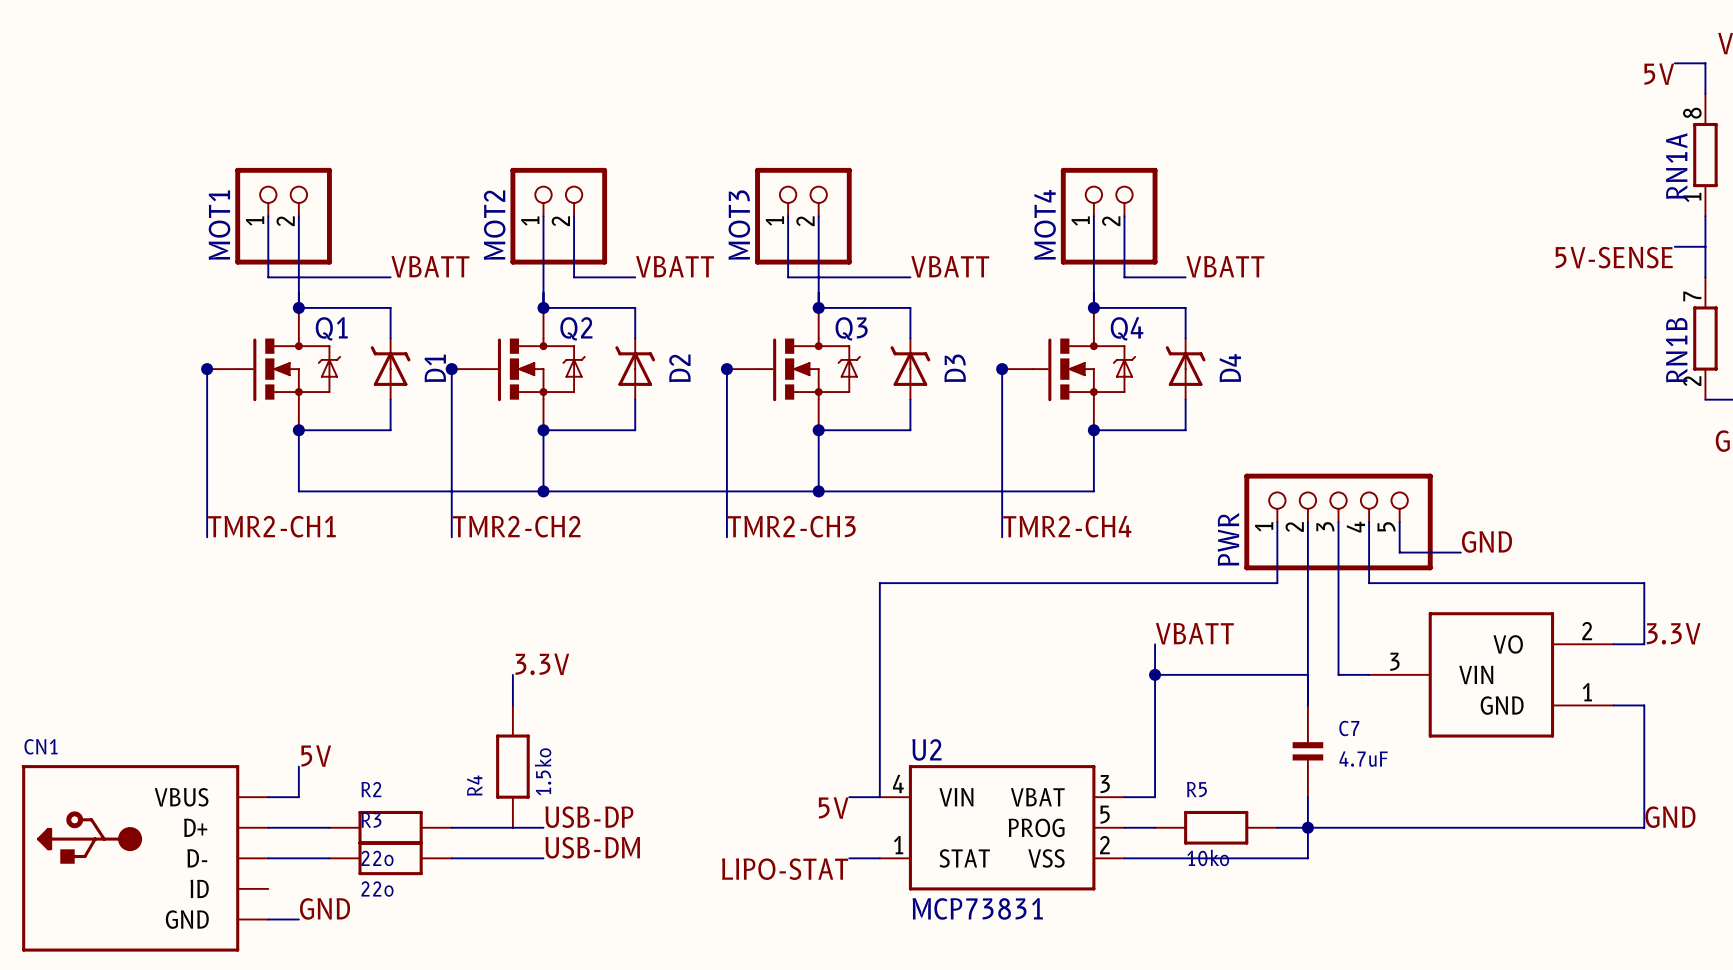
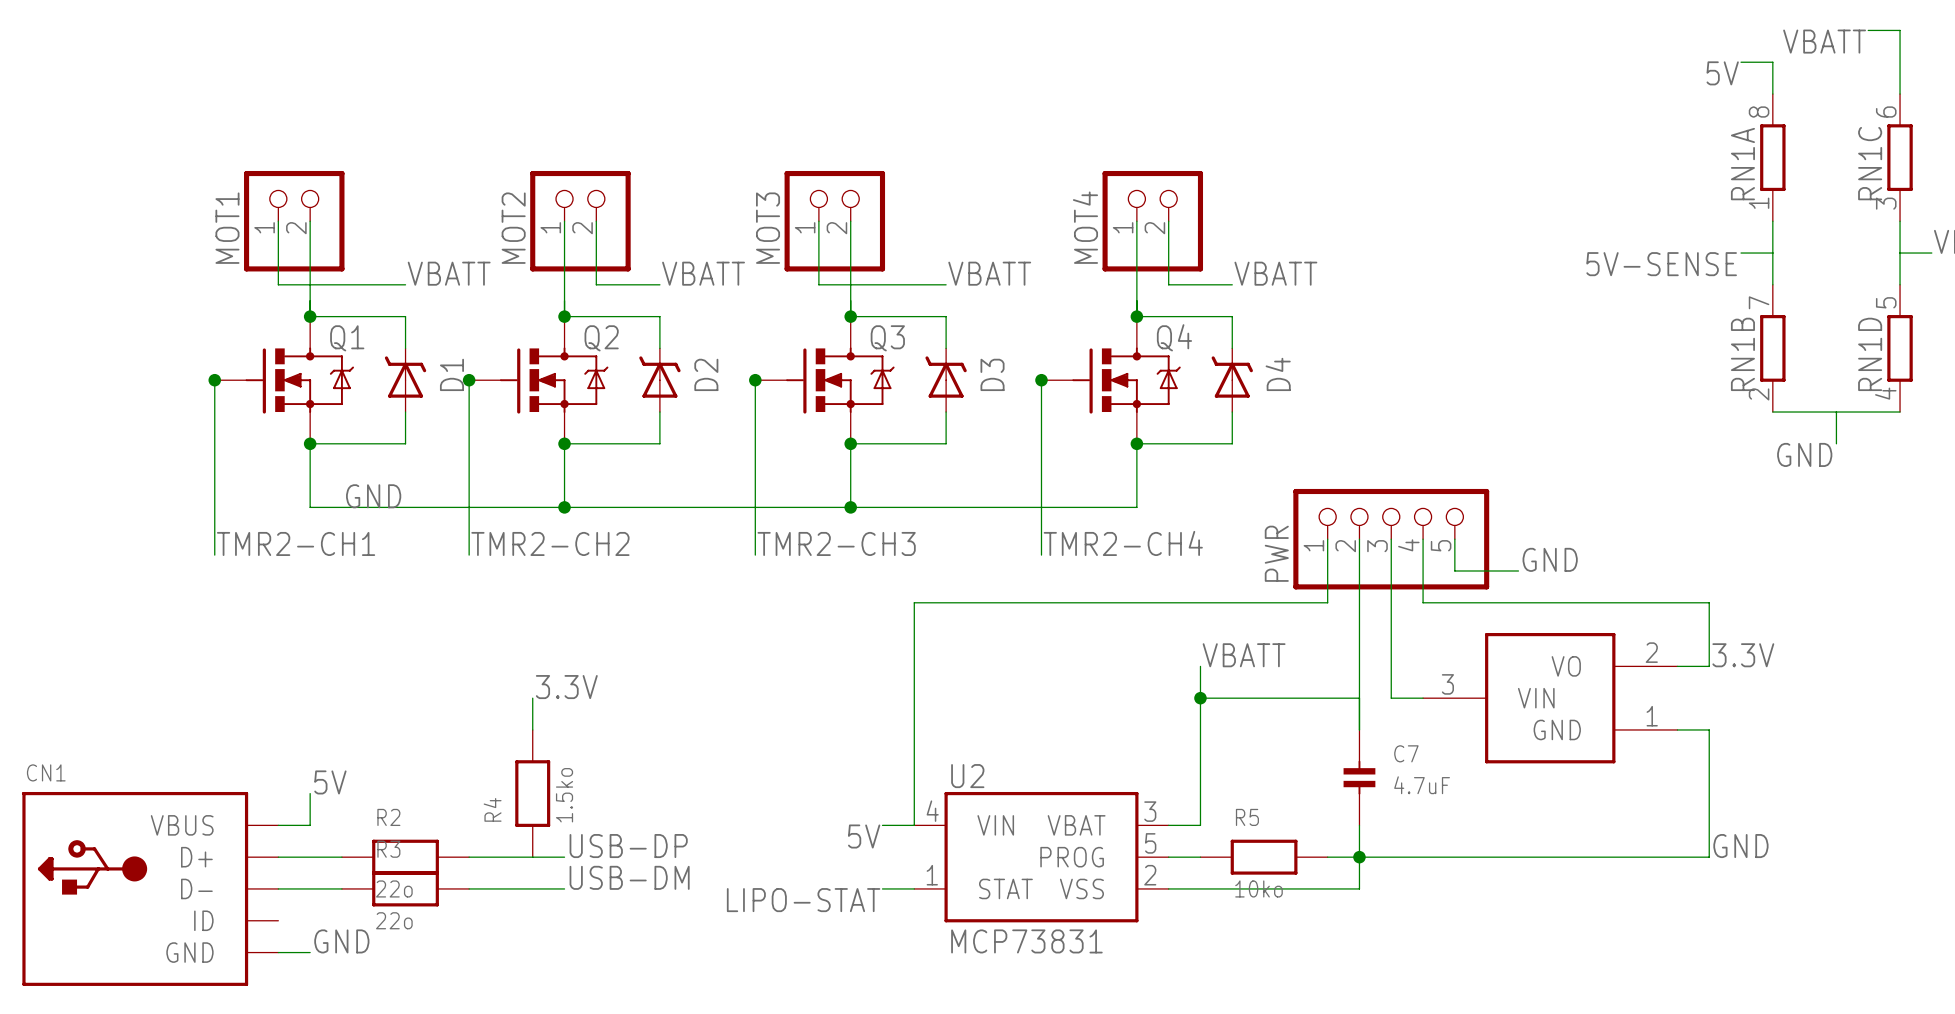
label: none -> GND (373, 496)

